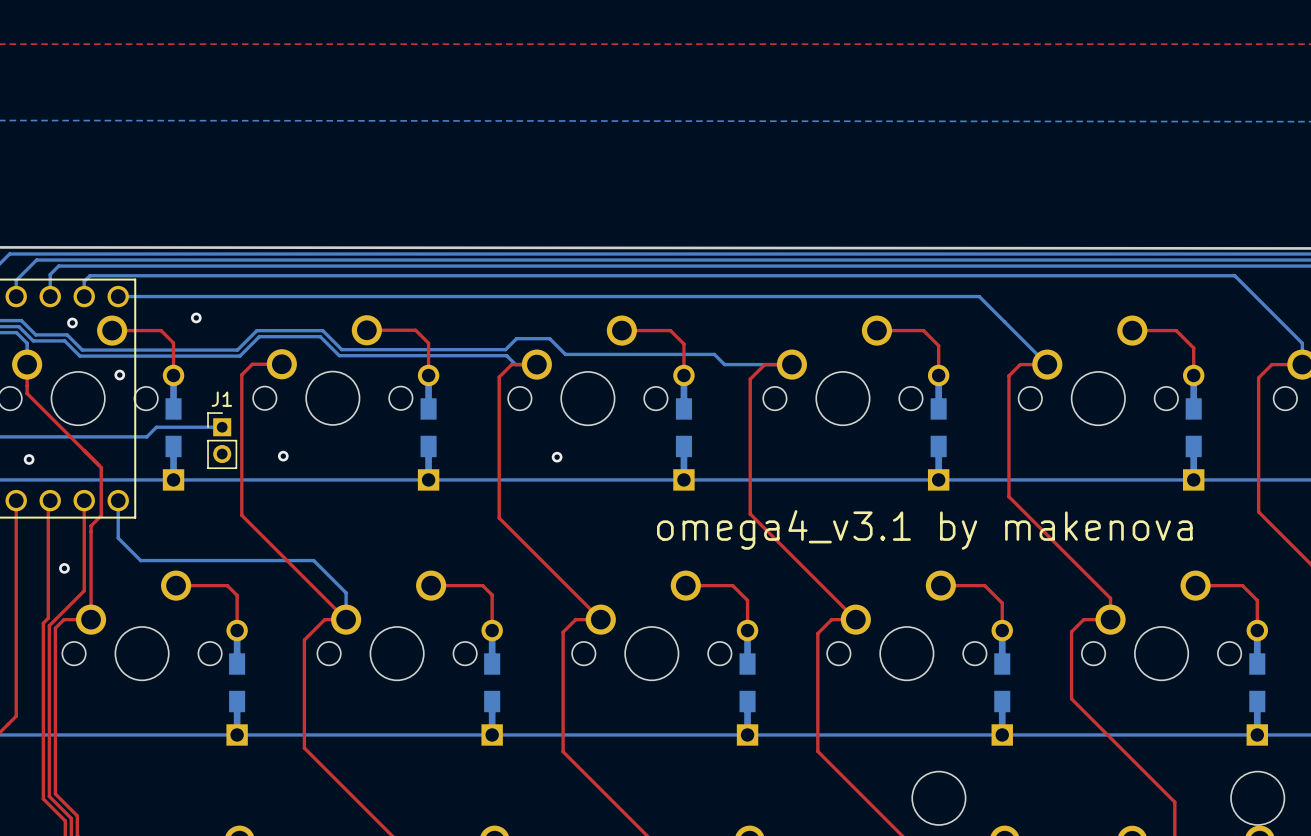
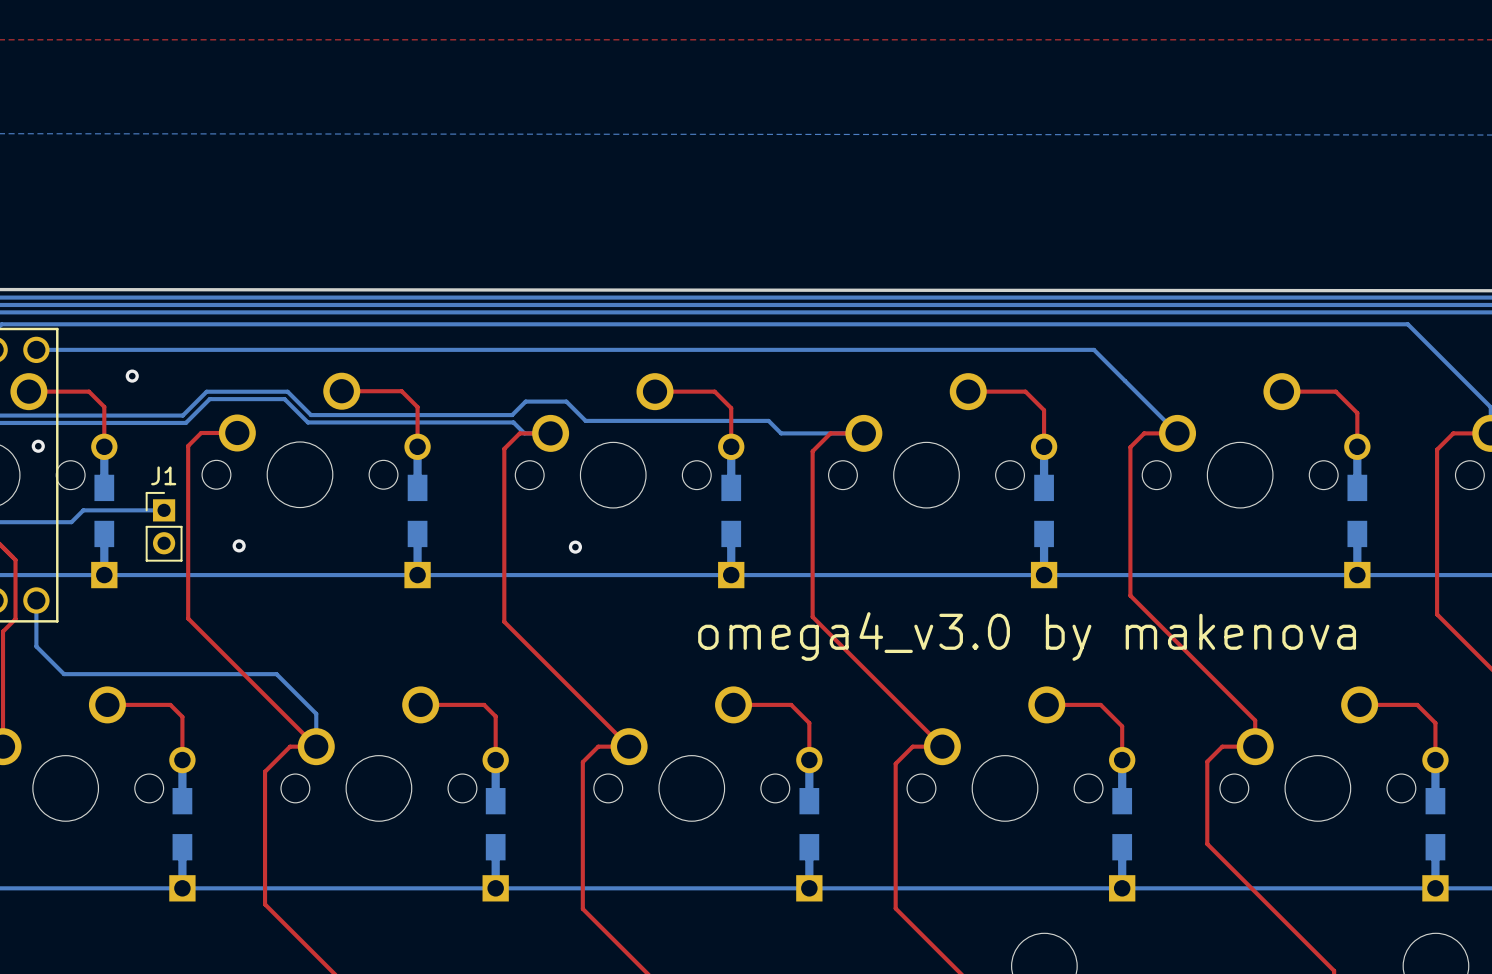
text: omega4_v3.1 by makenova (924, 529) -> omega4_v3.0 by makenova (1027, 636)

